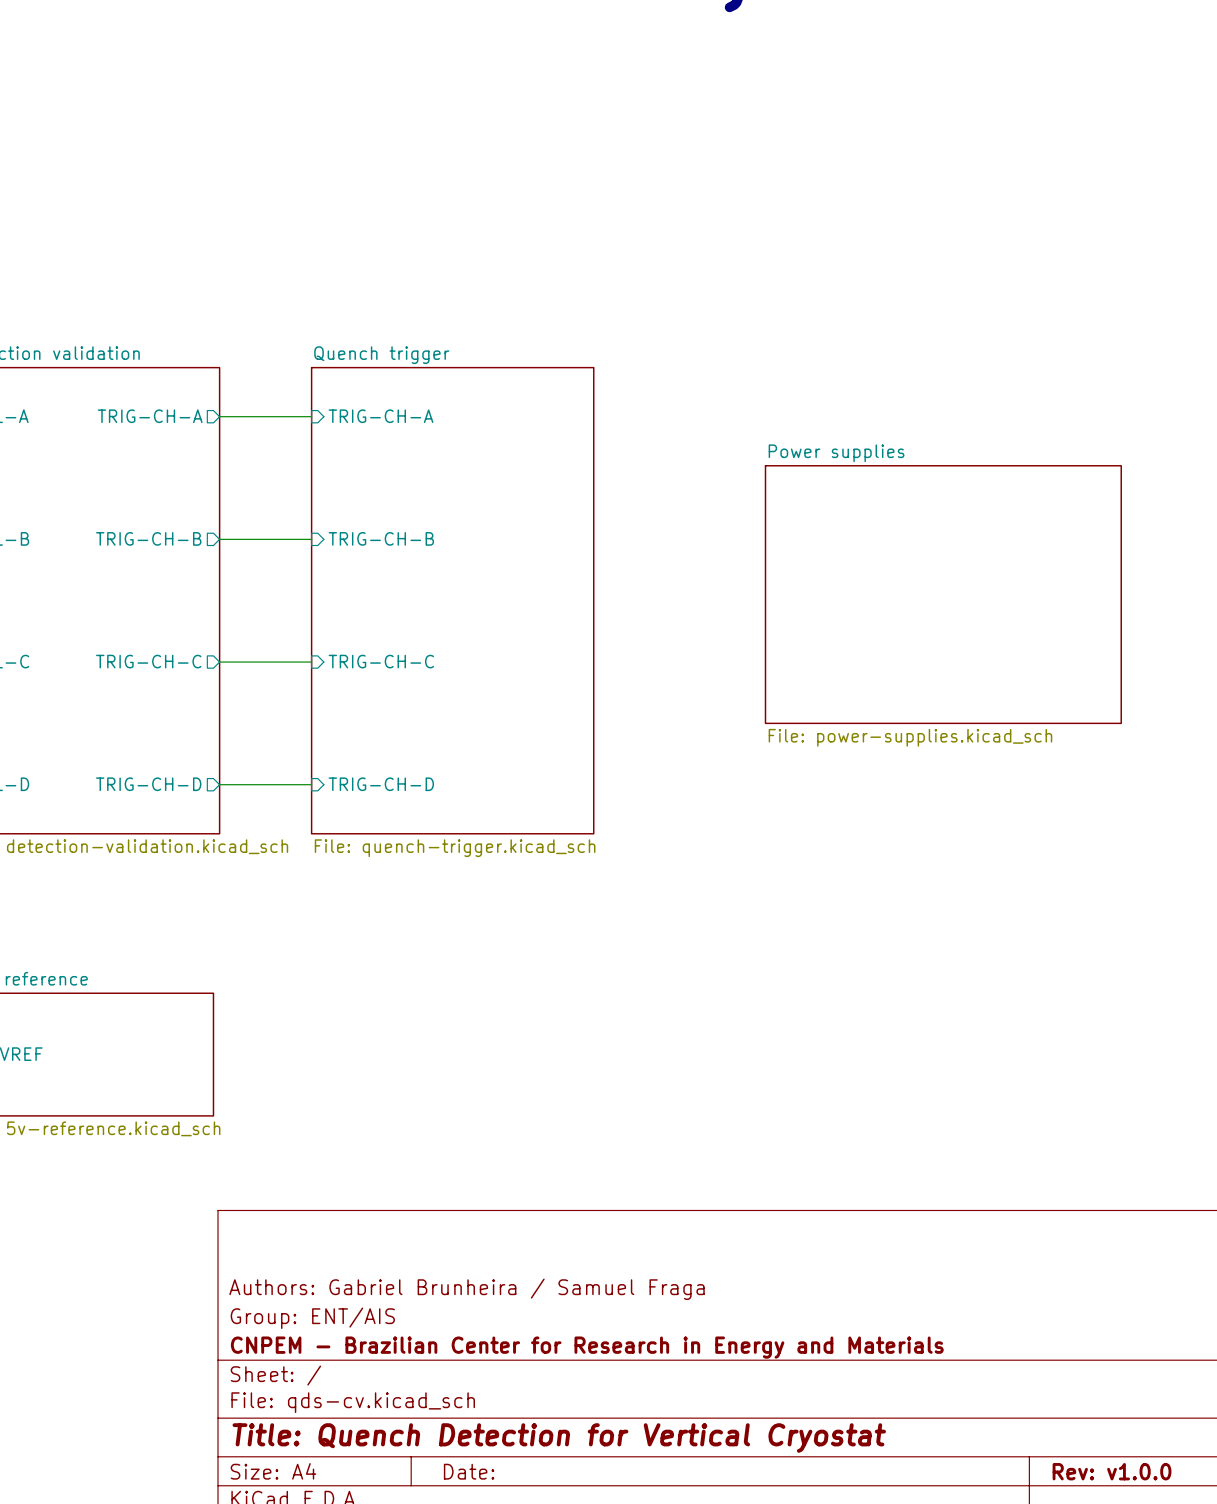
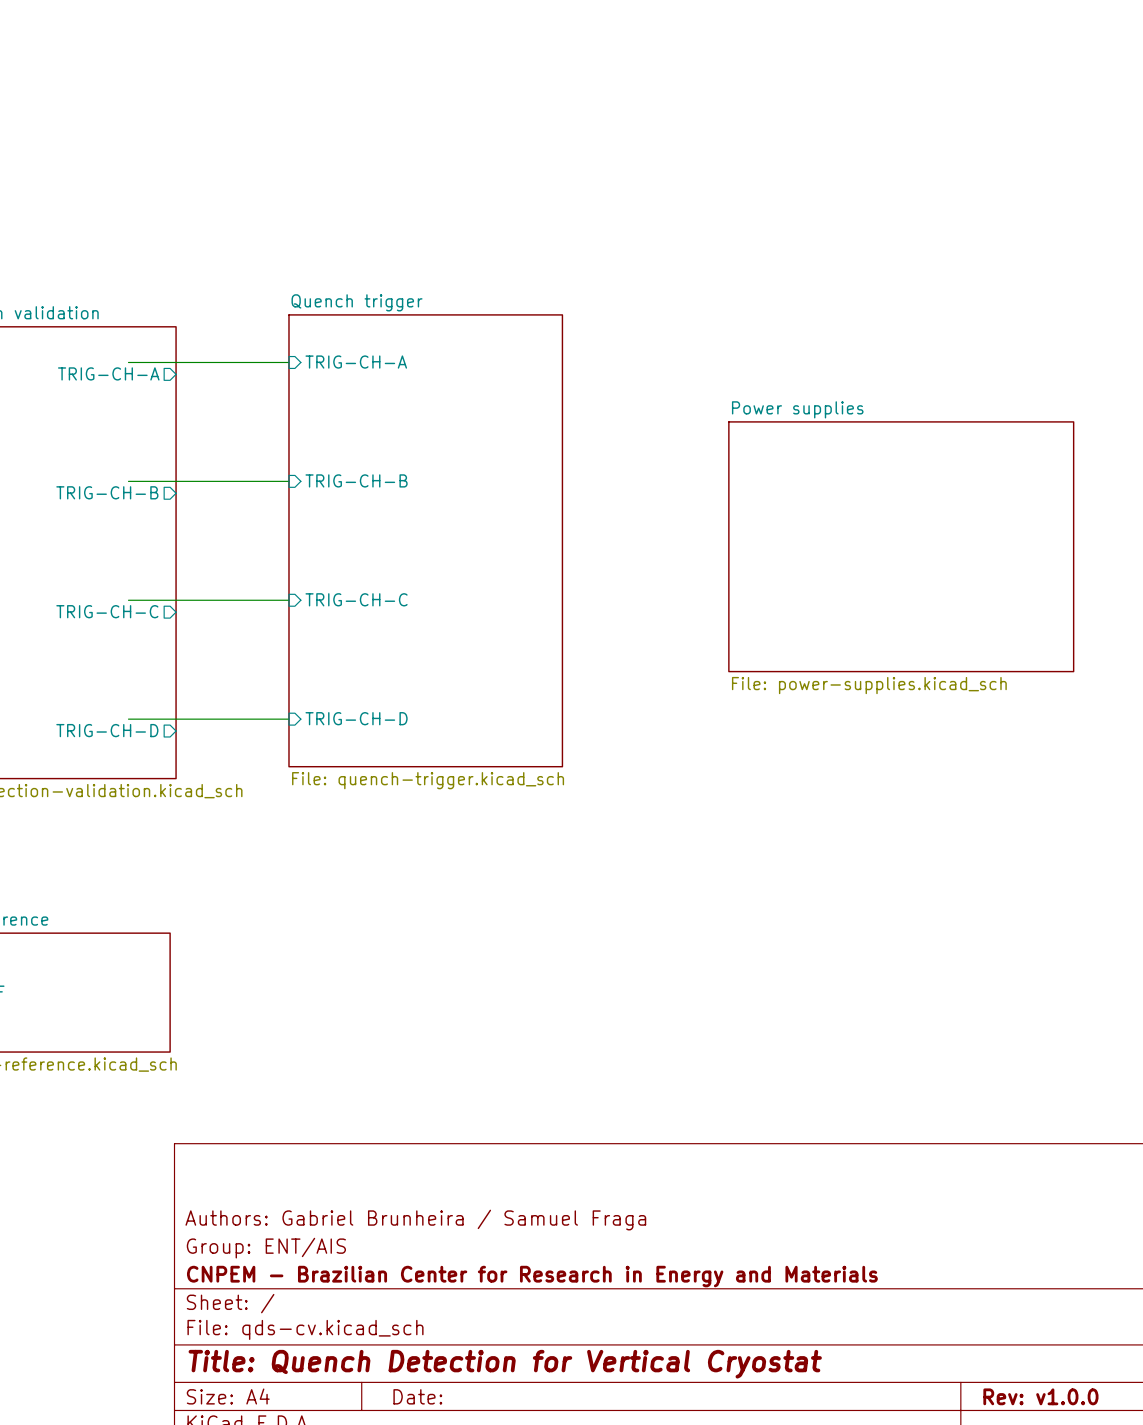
wire: none -> (128, 362) (288, 362)
wire: (219, 416) (311, 416) -> none
sheet pin position: TRIG-CH-A (381, 416) -> TRIG-CH-A (356, 362)
wire: none -> (128, 481) (288, 481)
sheet pin position: TRIG-CH-B (381, 538) -> TRIG-CH-B (356, 480)
wire: (219, 539) (311, 539) -> none
sheet Power supplies position: (943, 594) -> (901, 546)
sheet Quench trigger position: (452, 600) -> (425, 540)
wire: none -> (128, 600) (288, 600)
sheet pin position: TRIG-CH-C (381, 661) -> TRIG-CH-C (356, 599)
wire: (219, 662) (311, 662) -> none
wire: none -> (128, 719) (288, 719)
wire: (219, 784) (311, 784) -> none
sheet pin position: TRIG-CH-D (381, 784) -> TRIG-CH-D (356, 718)

